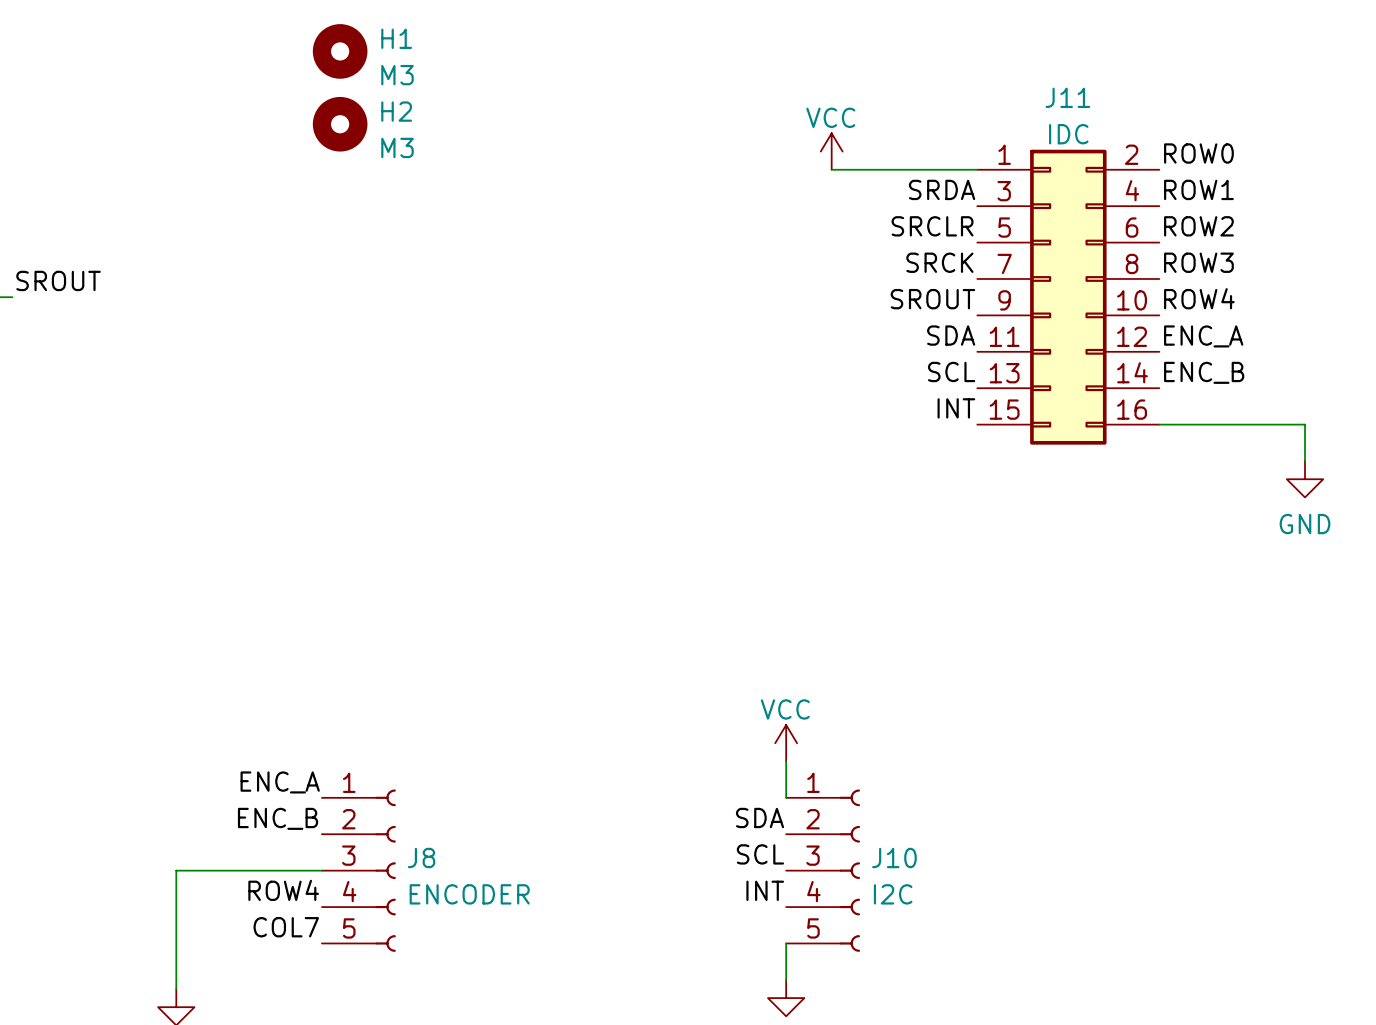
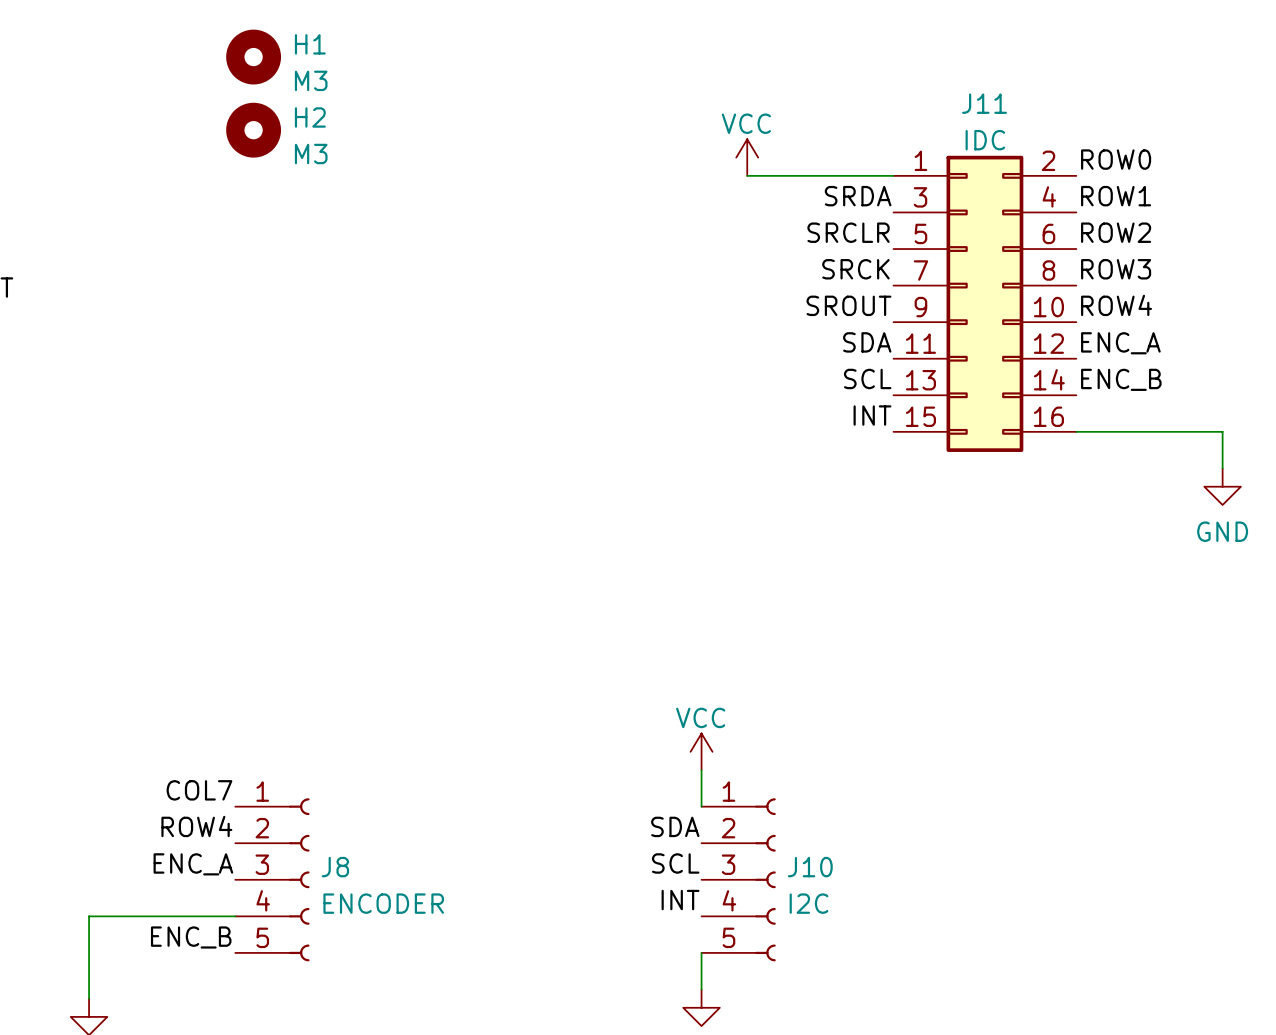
label: ENC_A (280, 782) -> COL7 (199, 790)
label: ENC_B (278, 818) -> ROW4 (196, 826)
label: none -> ENC_A (193, 864)
wire: (321, 870) (176, 870) (176, 907) -> (235, 916) (89, 916)
label: ROW4 (283, 890) -> none
label: COL7 (286, 927) -> ENC_B (191, 937)

